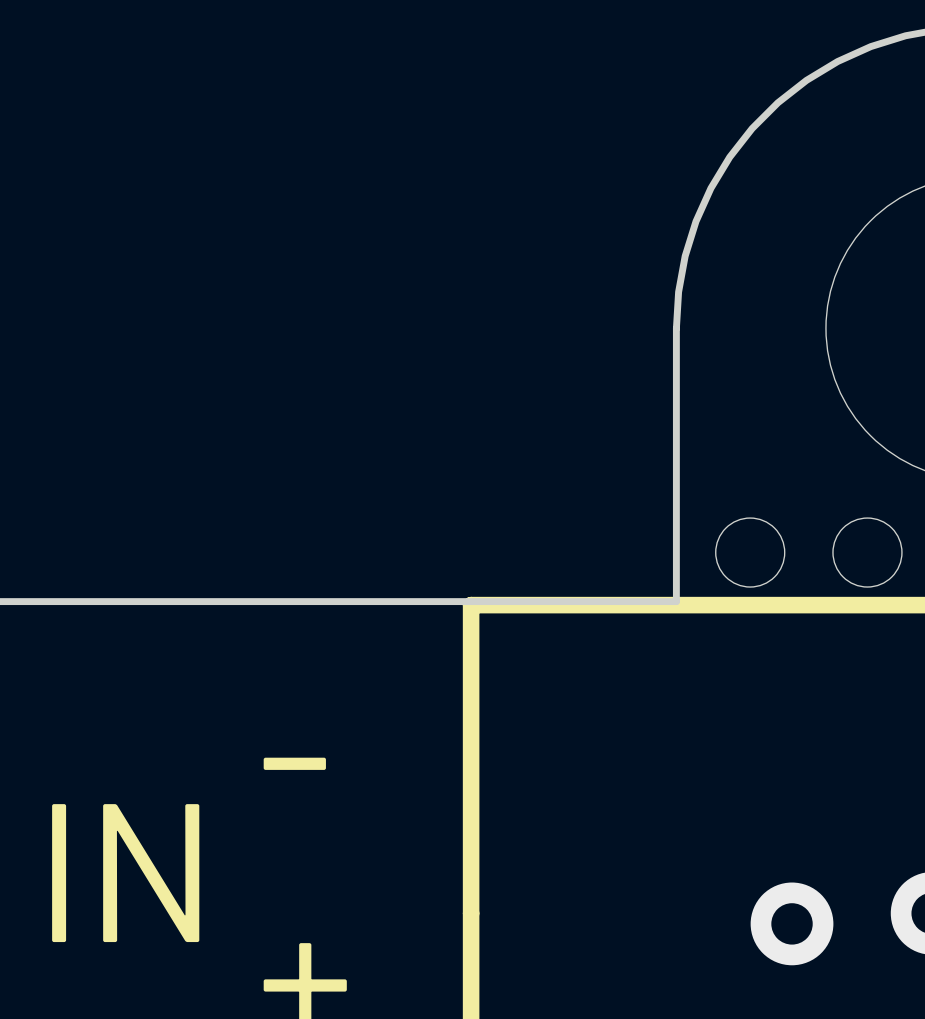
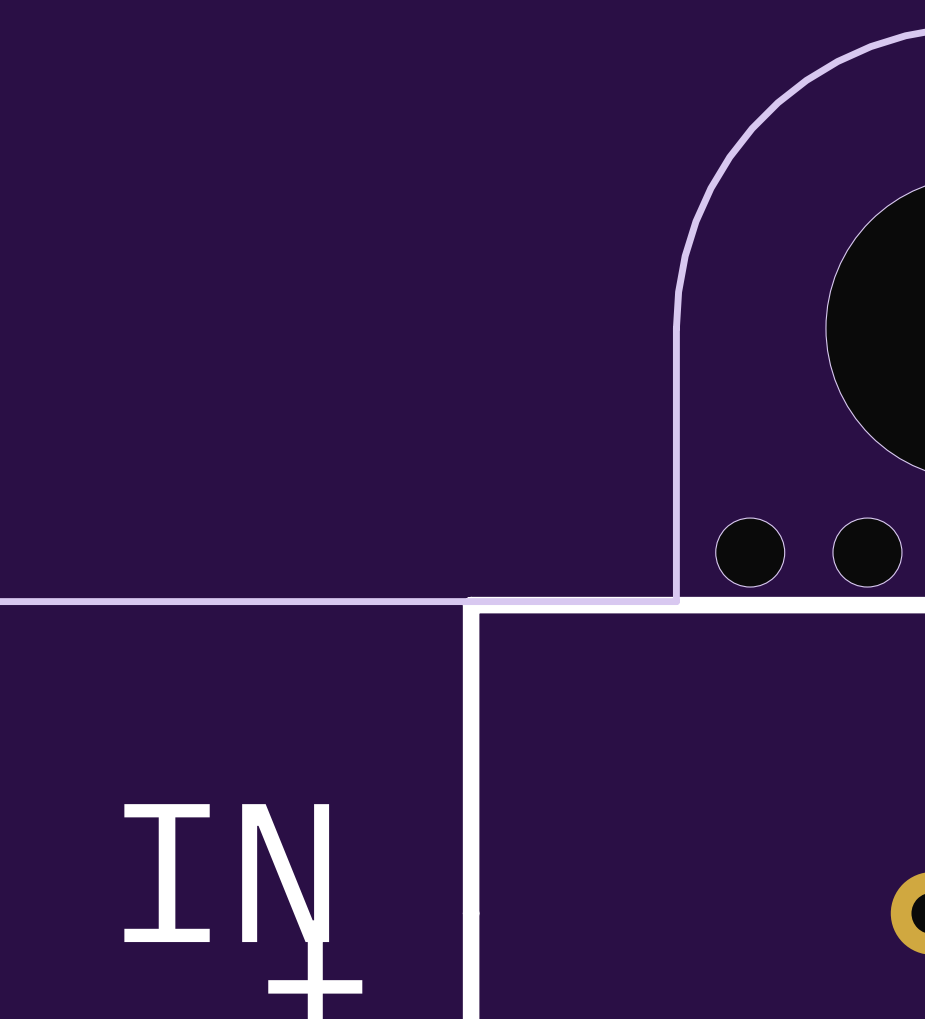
text: - (294, 763) -> none
via: (792, 923) -> none

